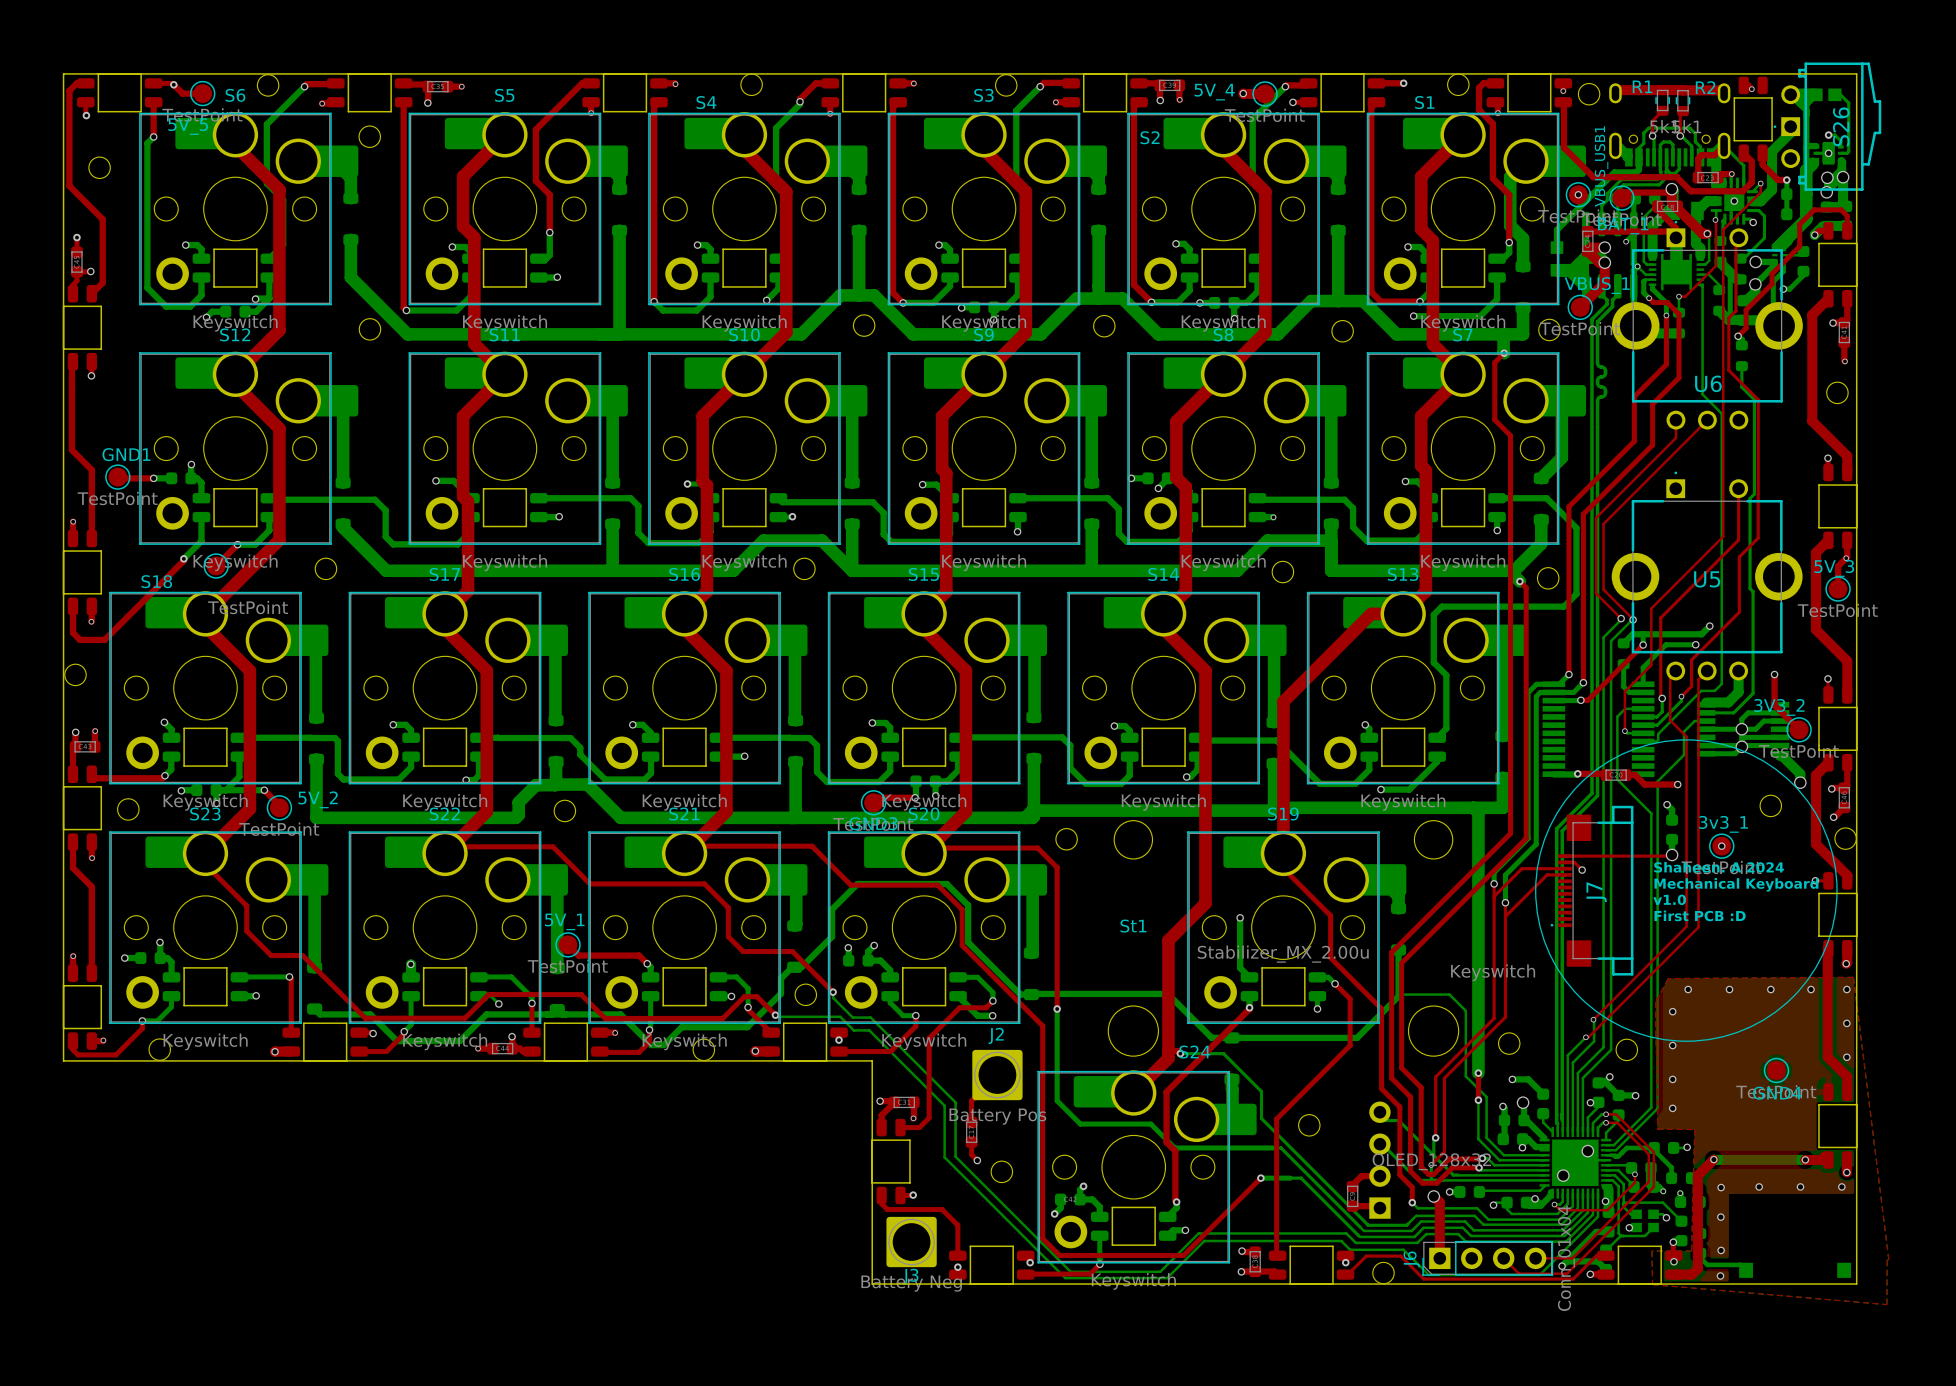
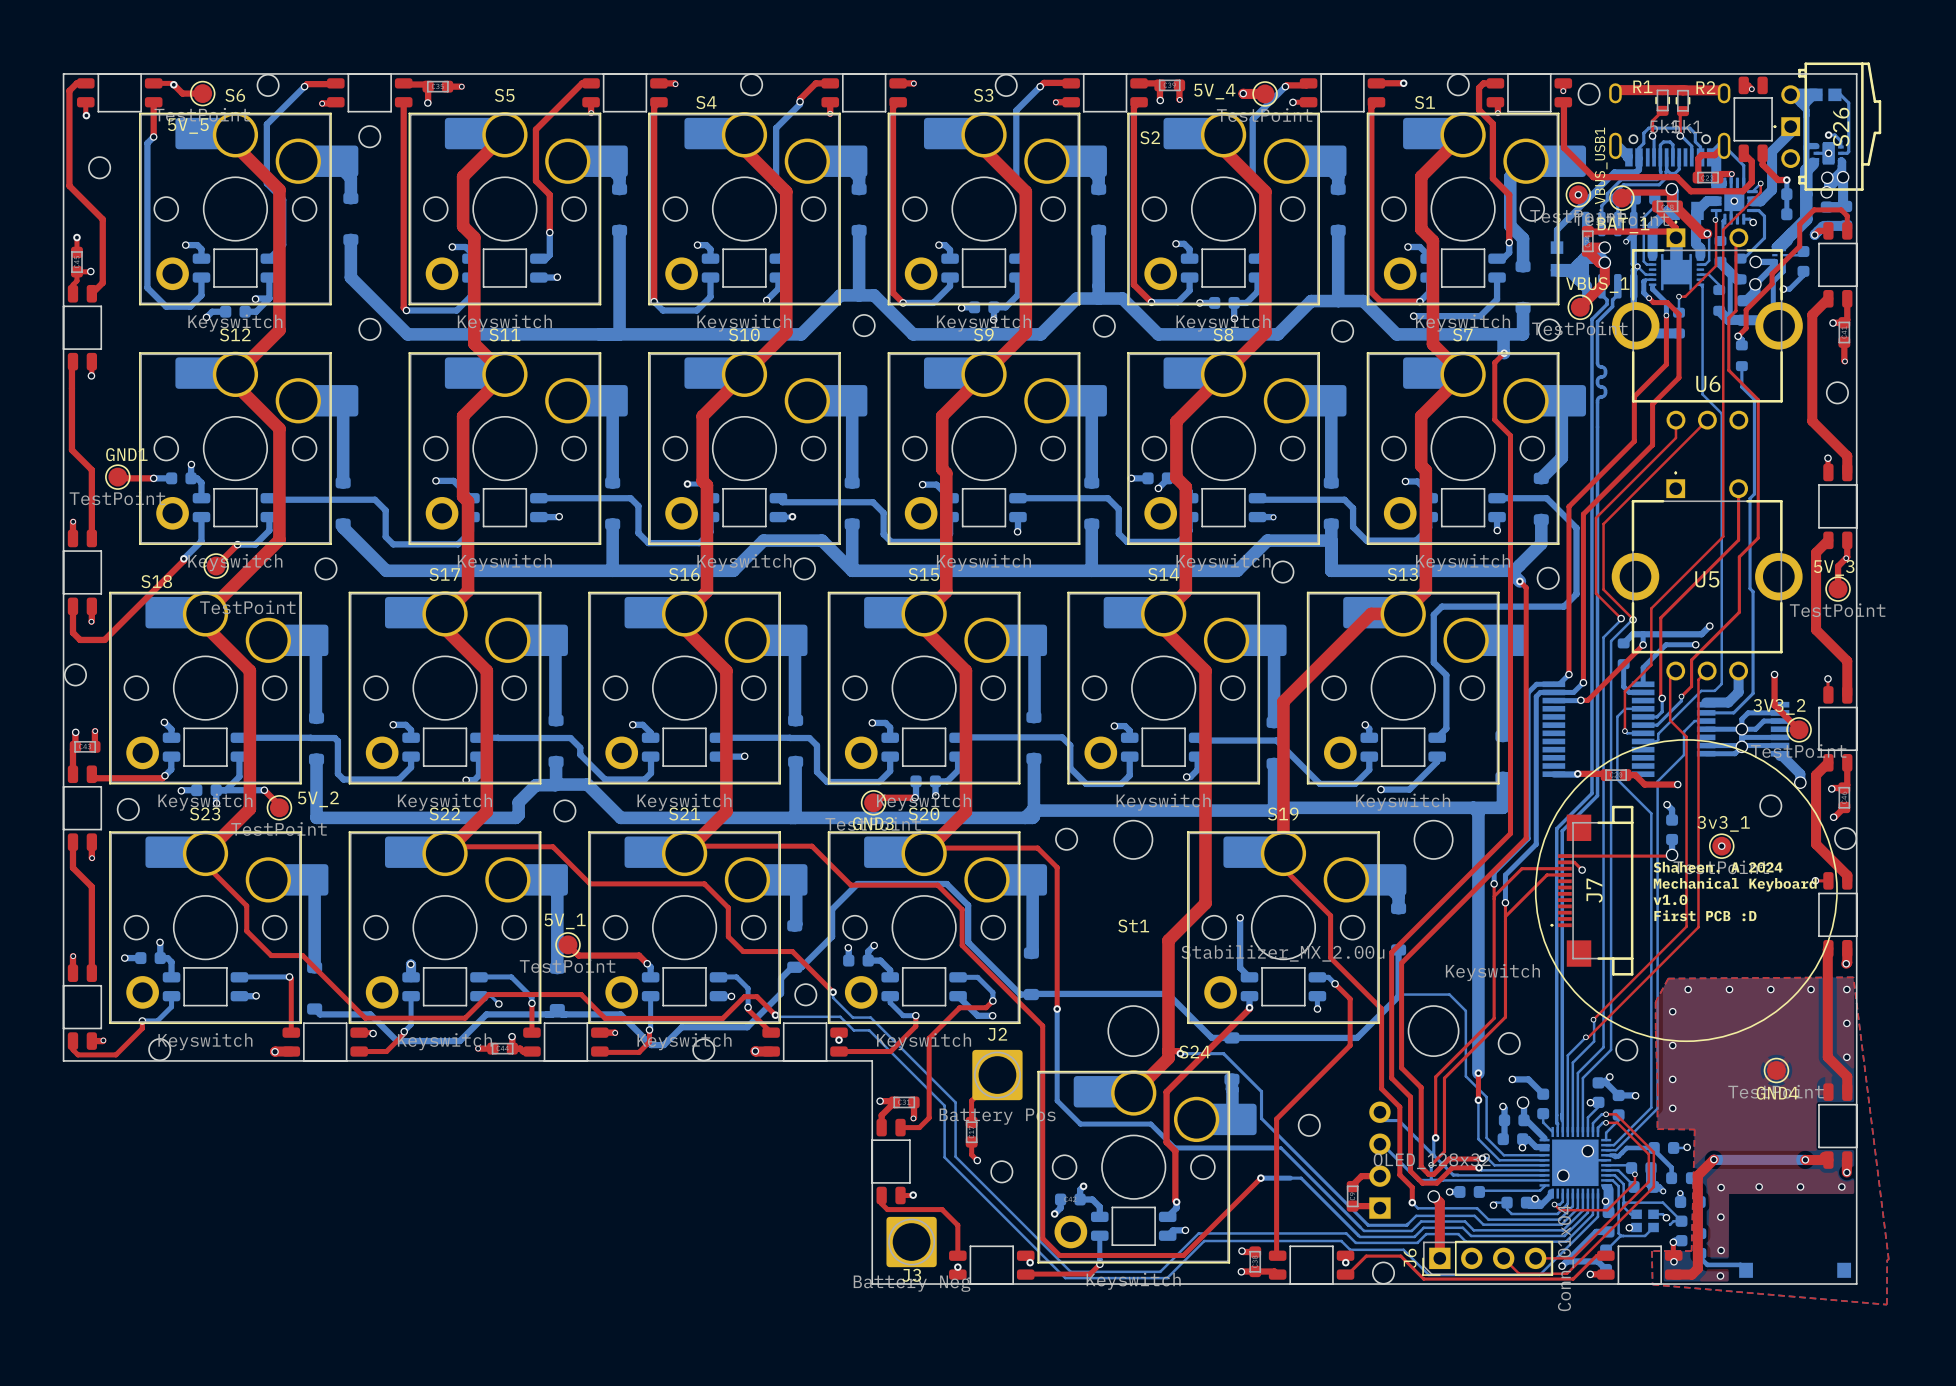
bottom track: none -> (1681, 1221) (1673, 1221) (1669, 1224)

